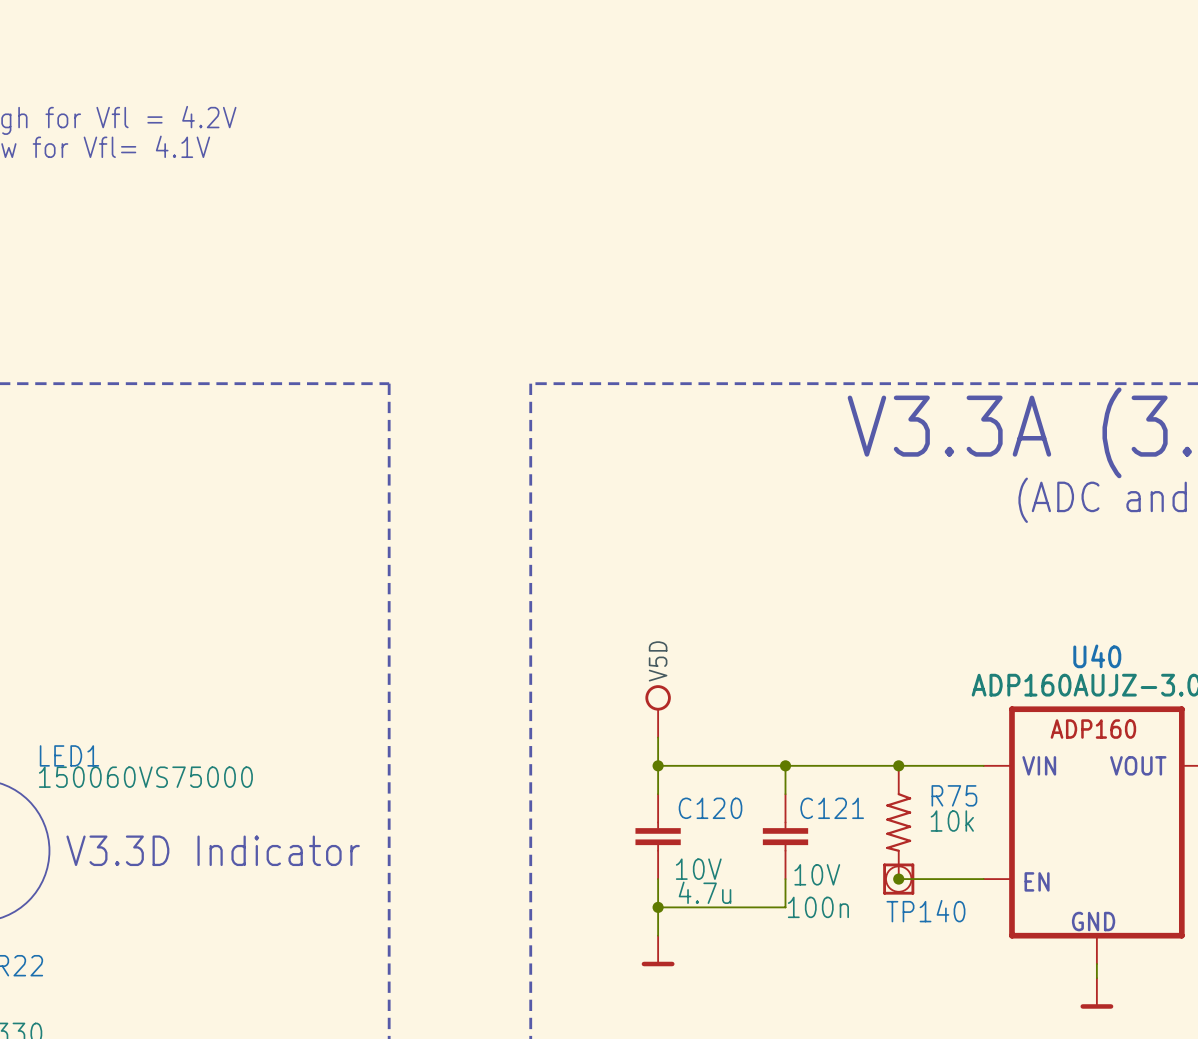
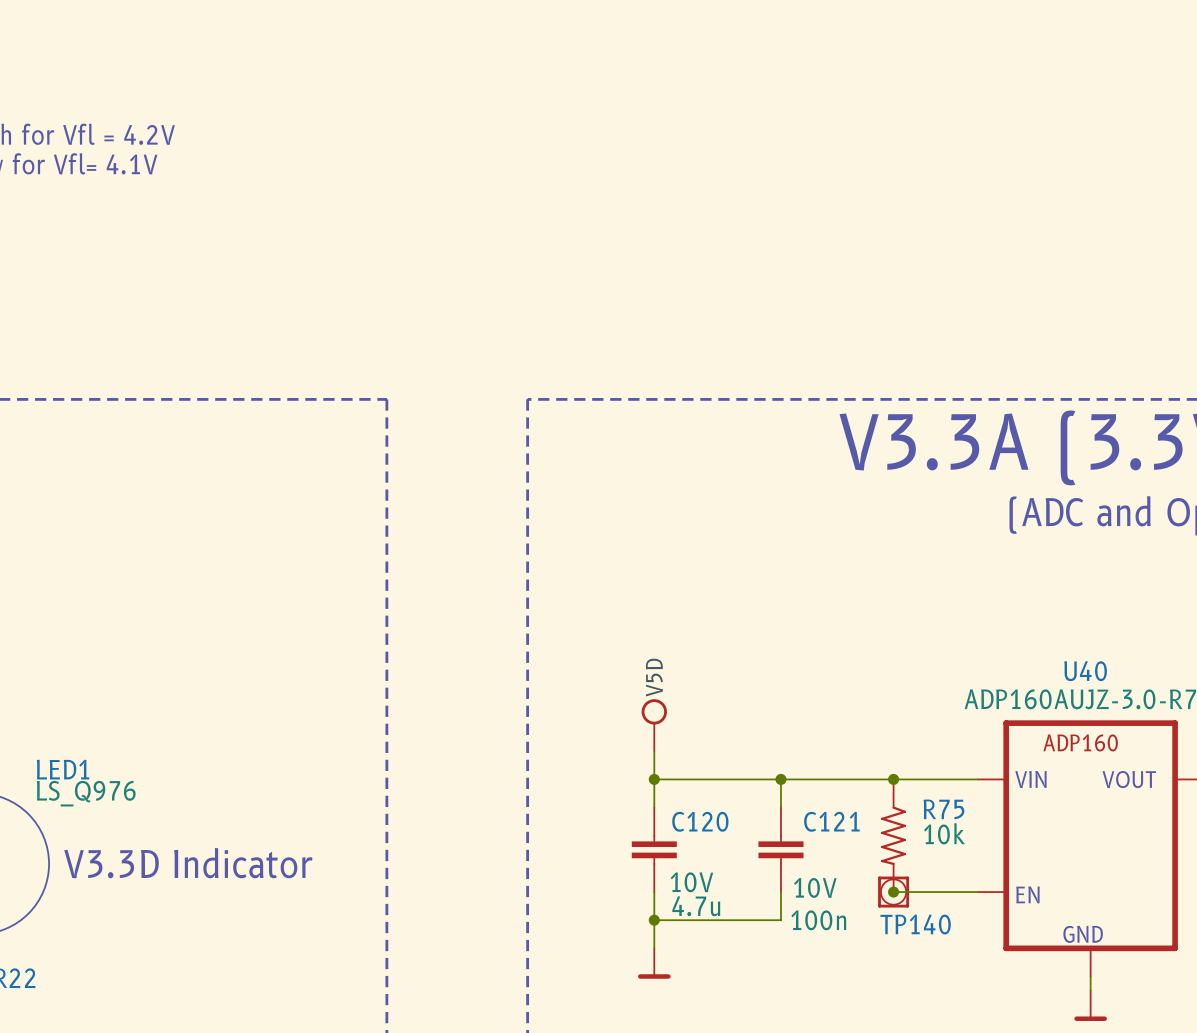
LED1 value: 150060VS75000 (145, 777) -> LS_Q976 (86, 793)

